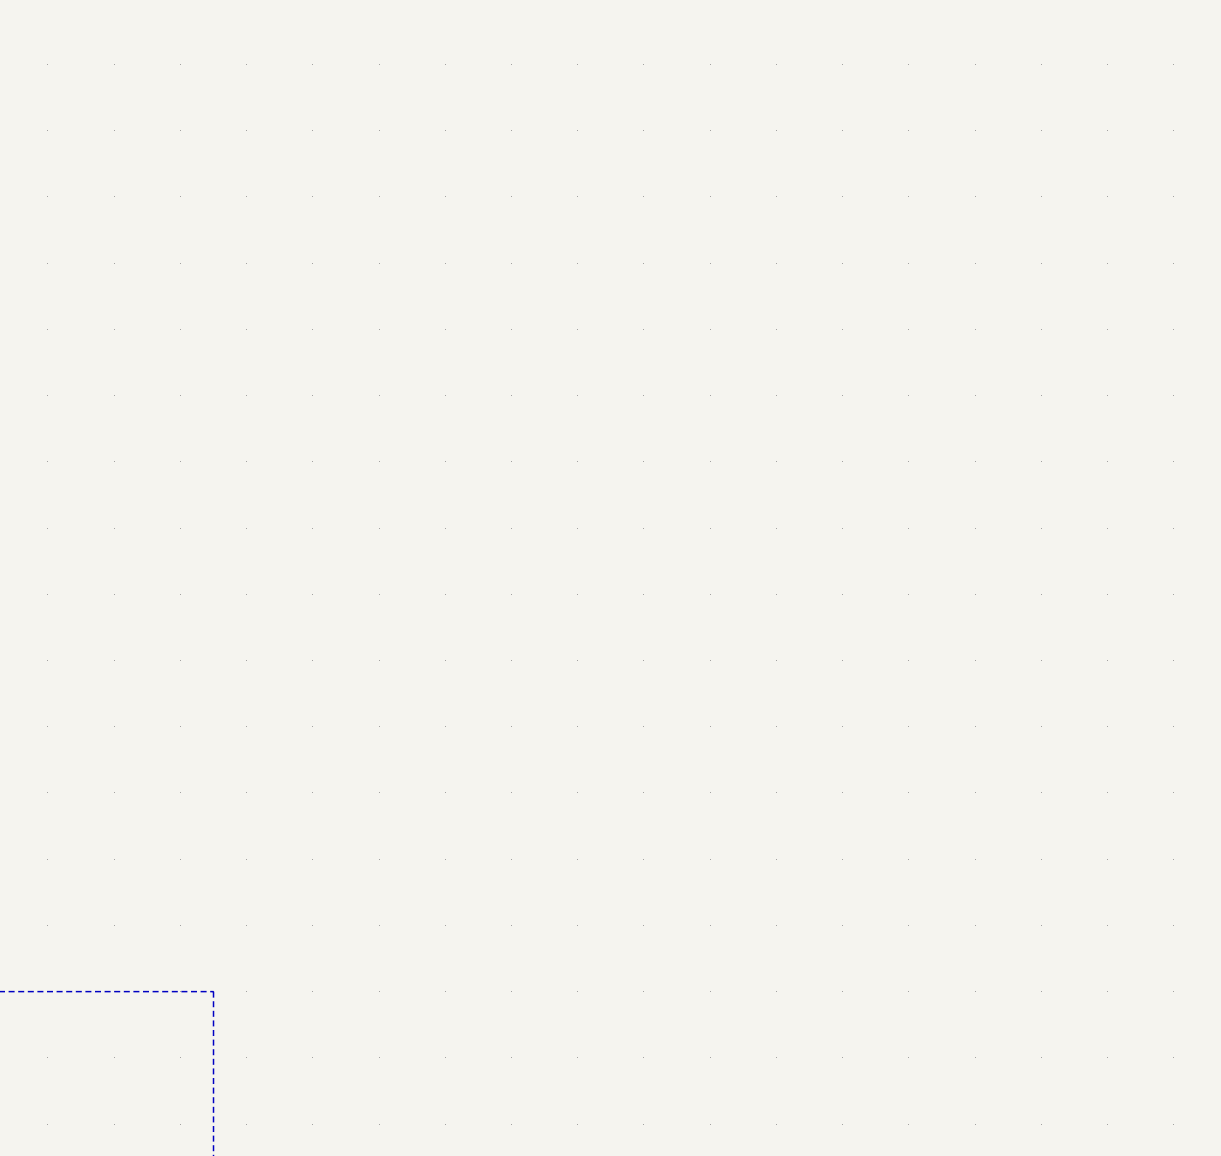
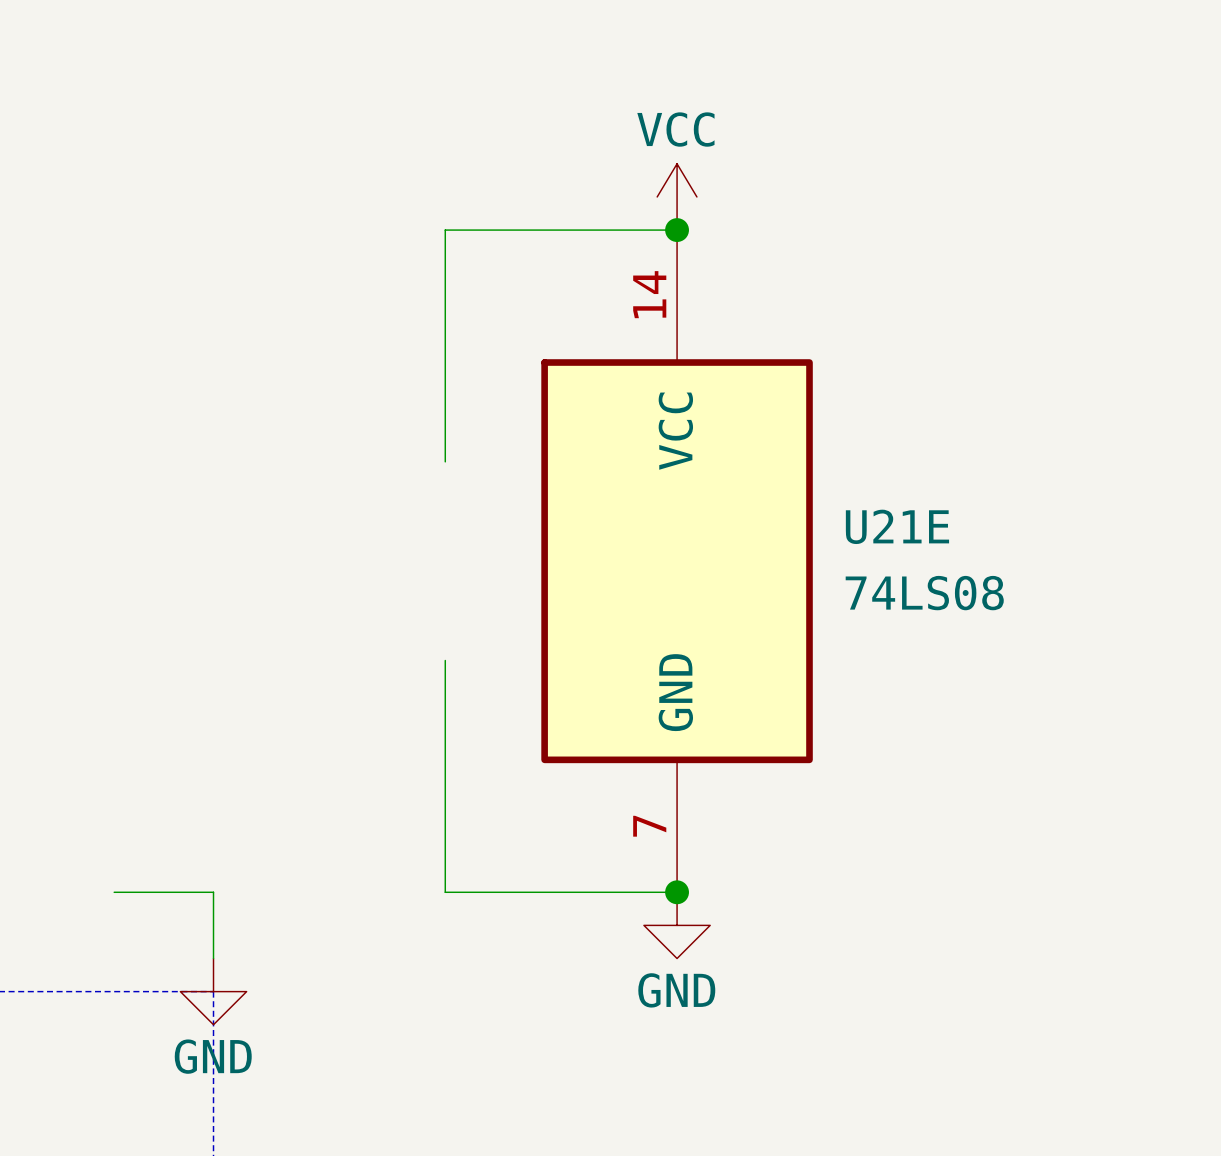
power symbol: none -> VCC (677, 196)
wire: none -> (677, 230) (445, 230) (445, 461)
junction: none -> (677, 230)
U21E: none -> 74LS08 (677, 561)
wire: none -> (445, 660) (445, 892) (677, 892)
wire: none -> (114, 892) (213, 892) (213, 958)
junction: none -> (677, 892)
power symbol: none -> GND (677, 925)
power symbol: none -> GND (213, 991)

